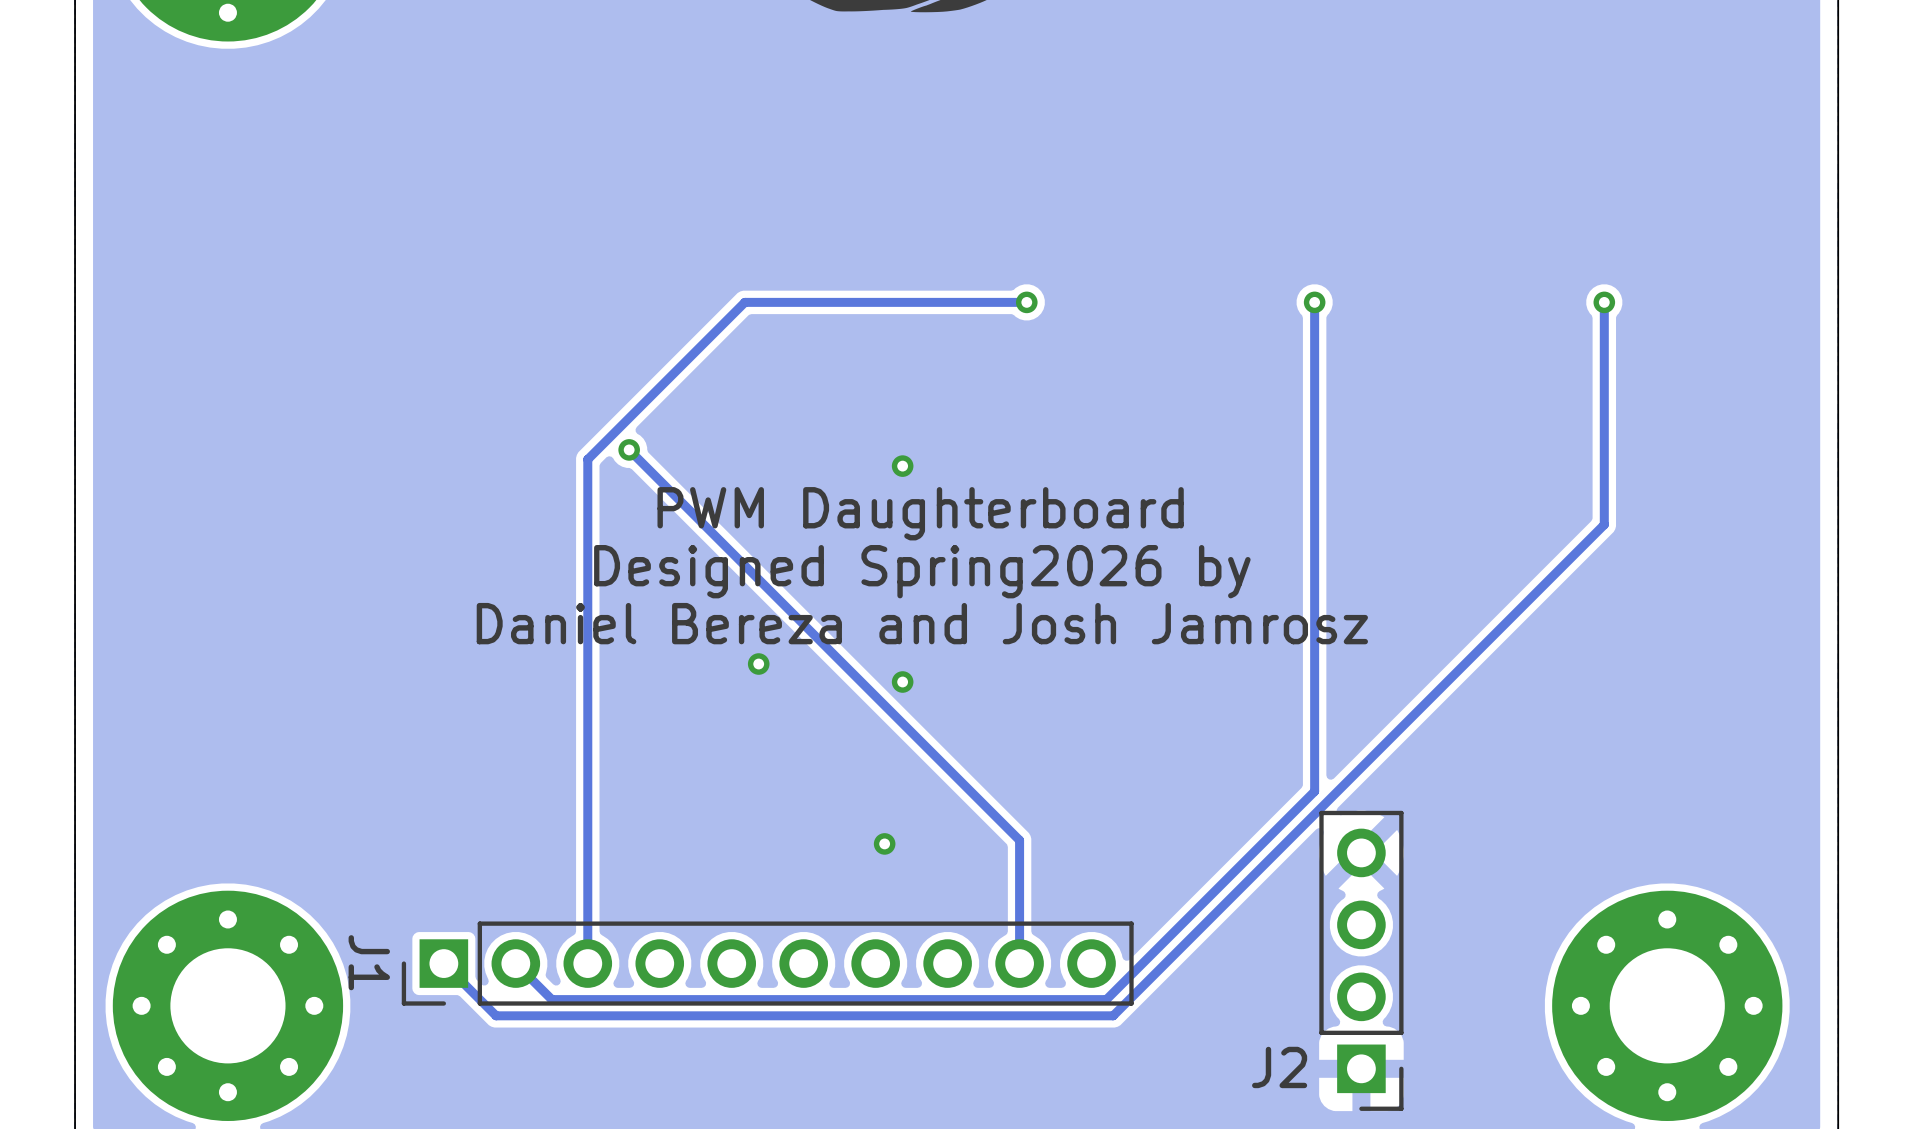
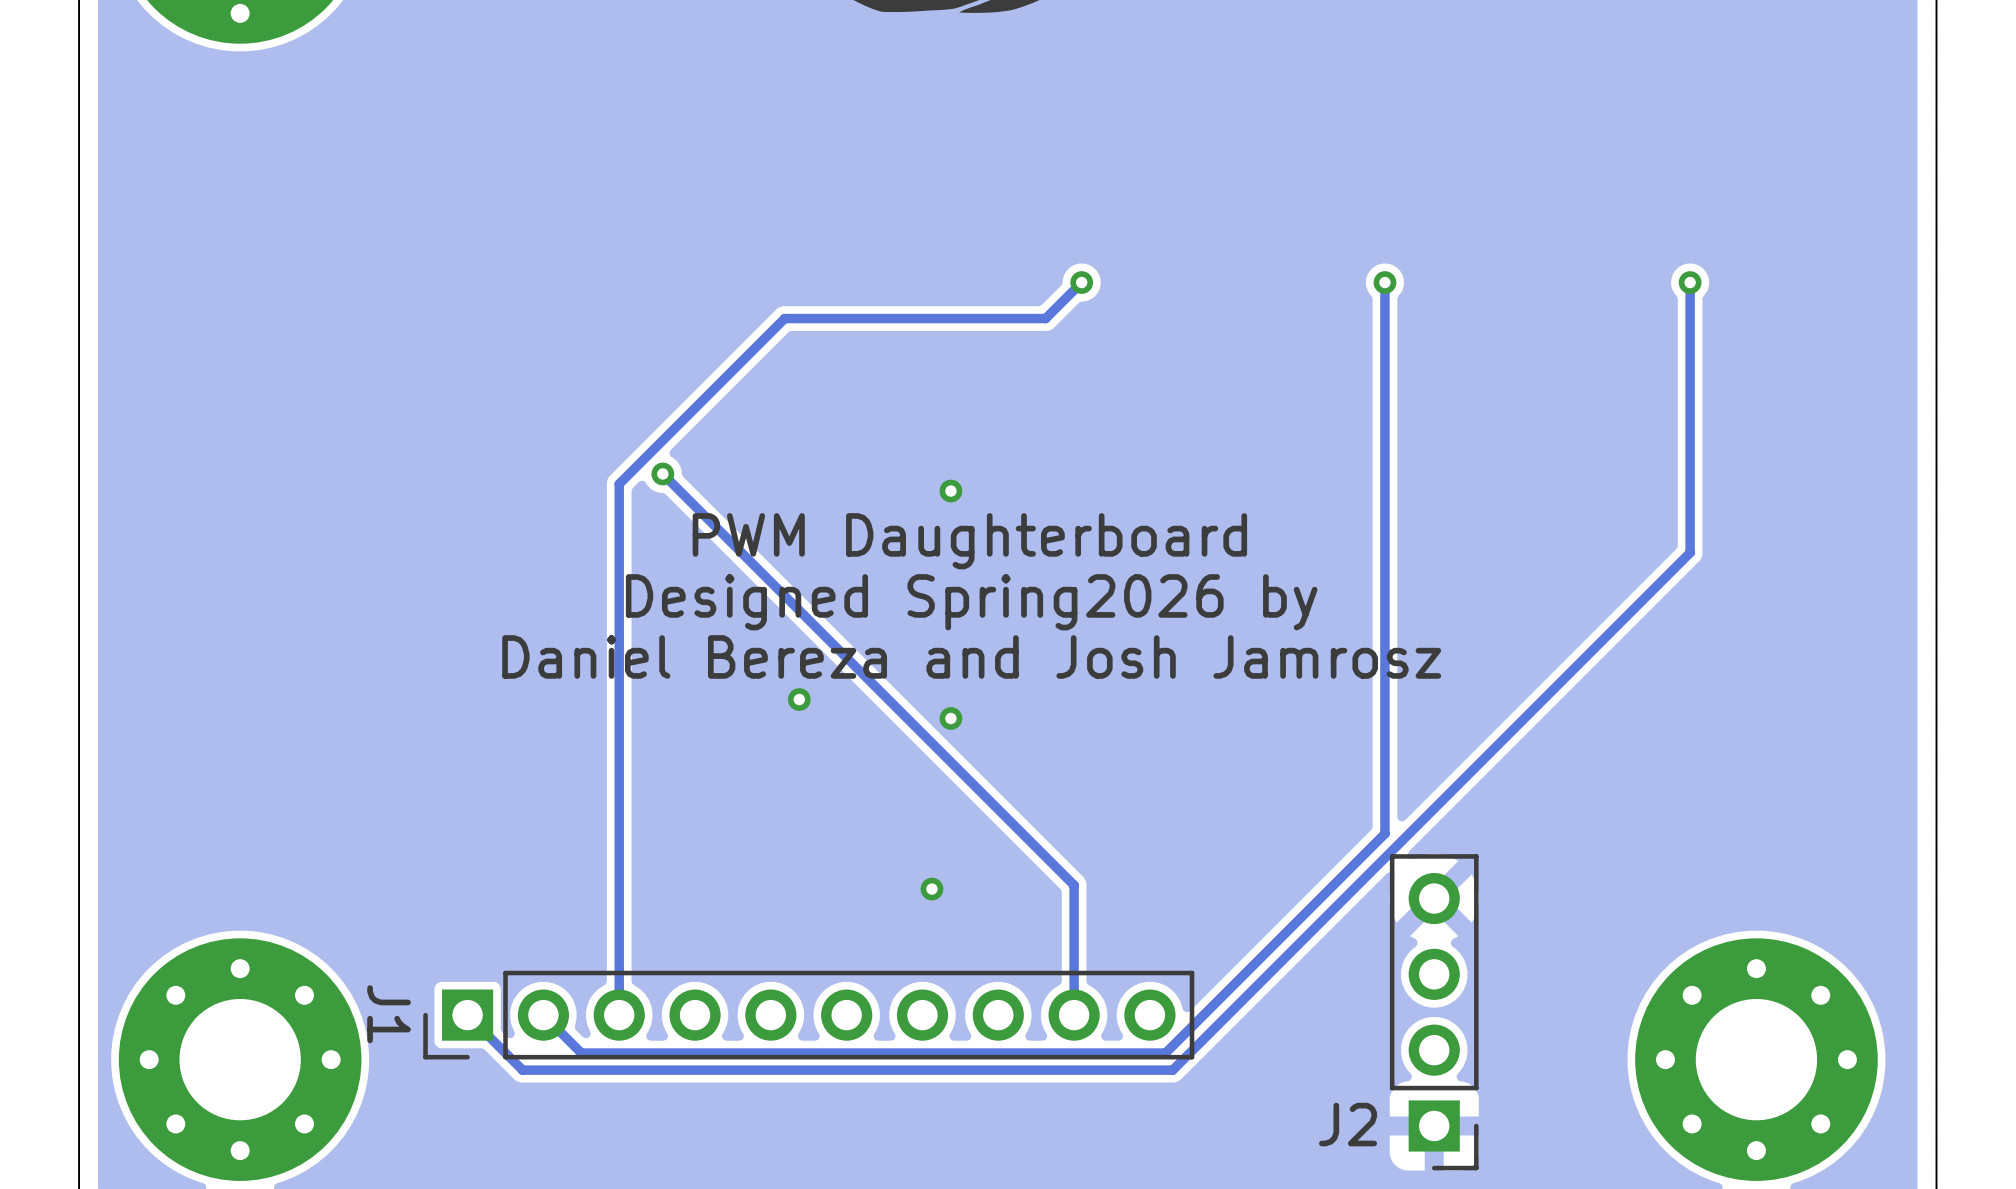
track: none -> (1384, 282) (1384, 318)
track: none -> (1690, 282) (1690, 318)
track: (1026, 302) (992, 302) -> (1081, 282) (1045, 318)
via position: (1026, 302) -> (1081, 282)
via position: (1314, 302) -> (1384, 282)
via position: (1604, 302) -> (1690, 282)

